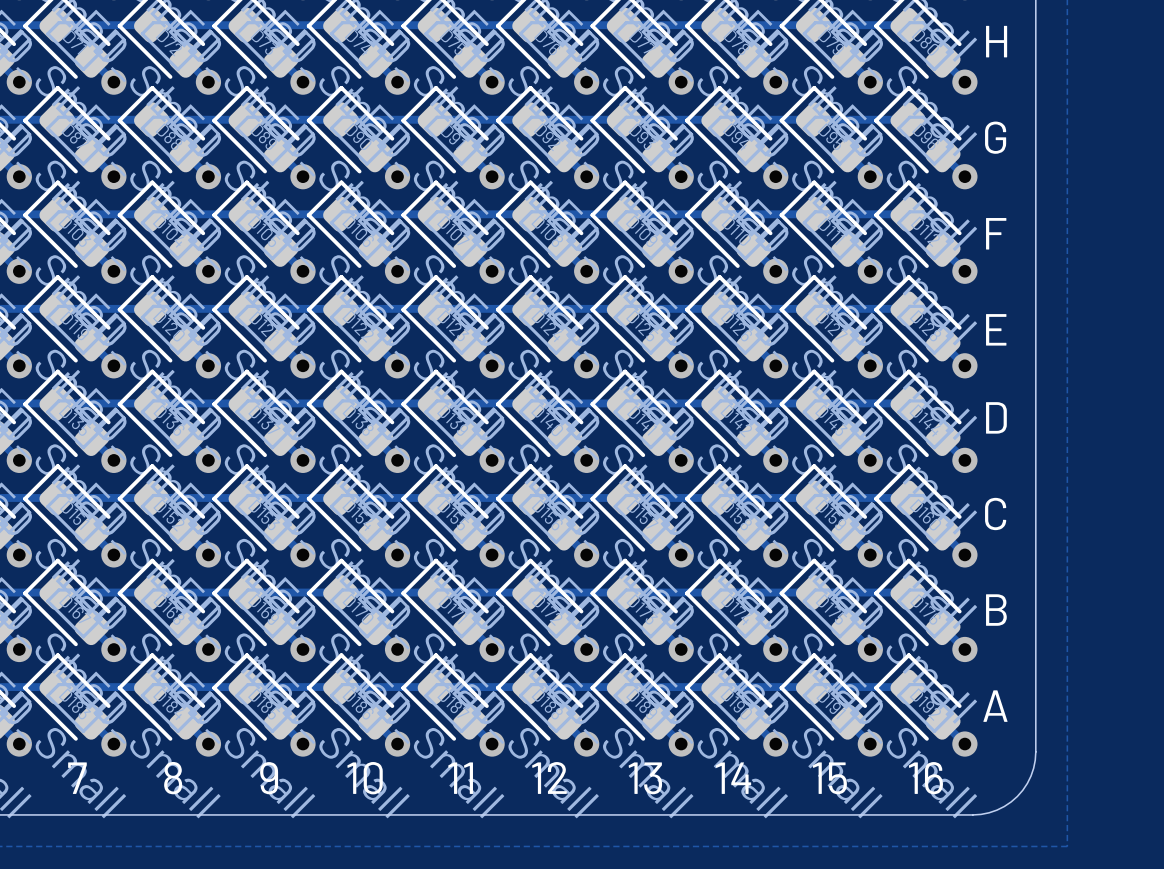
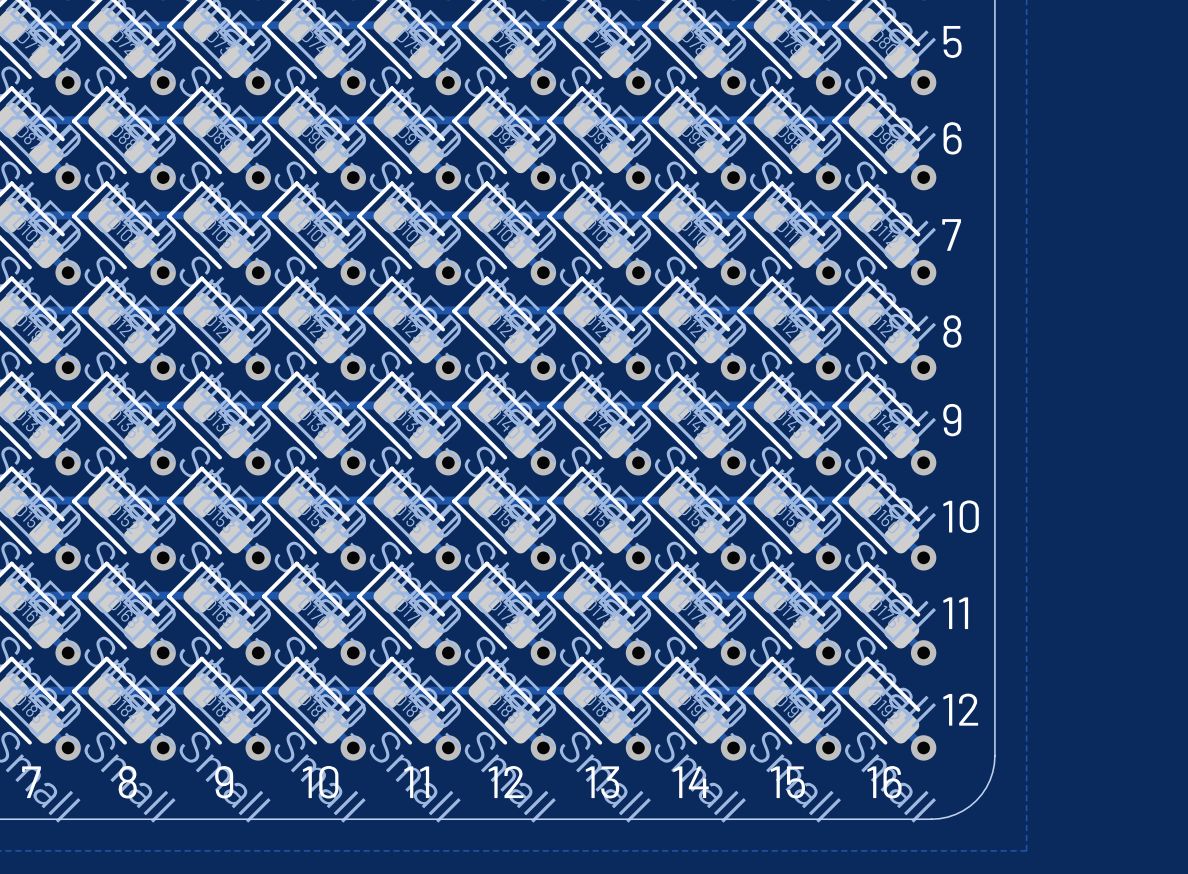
text: H (996, 41) -> 5 (952, 41)
text: G (995, 137) -> 6 (952, 138)
text: F (996, 233) -> 7 (951, 234)
text: E (996, 329) -> 8 (952, 331)
text: D (996, 417) -> 9 (952, 420)
text: C (995, 513) -> 10 (961, 516)
text: B (996, 610) -> 11 (955, 613)
text: A (995, 706) -> 12 (960, 709)

